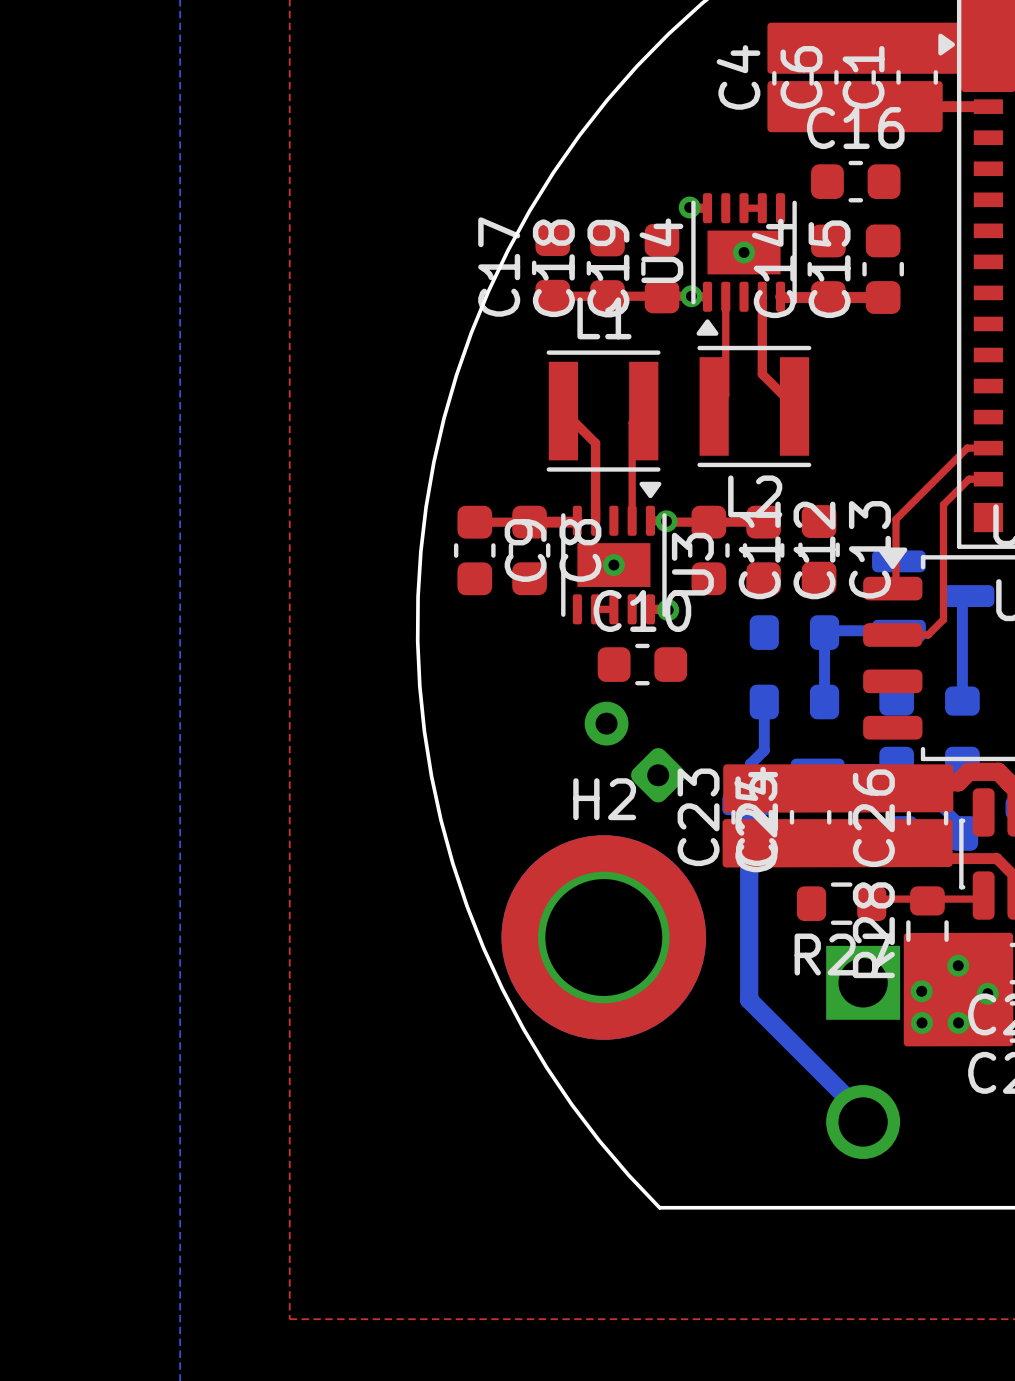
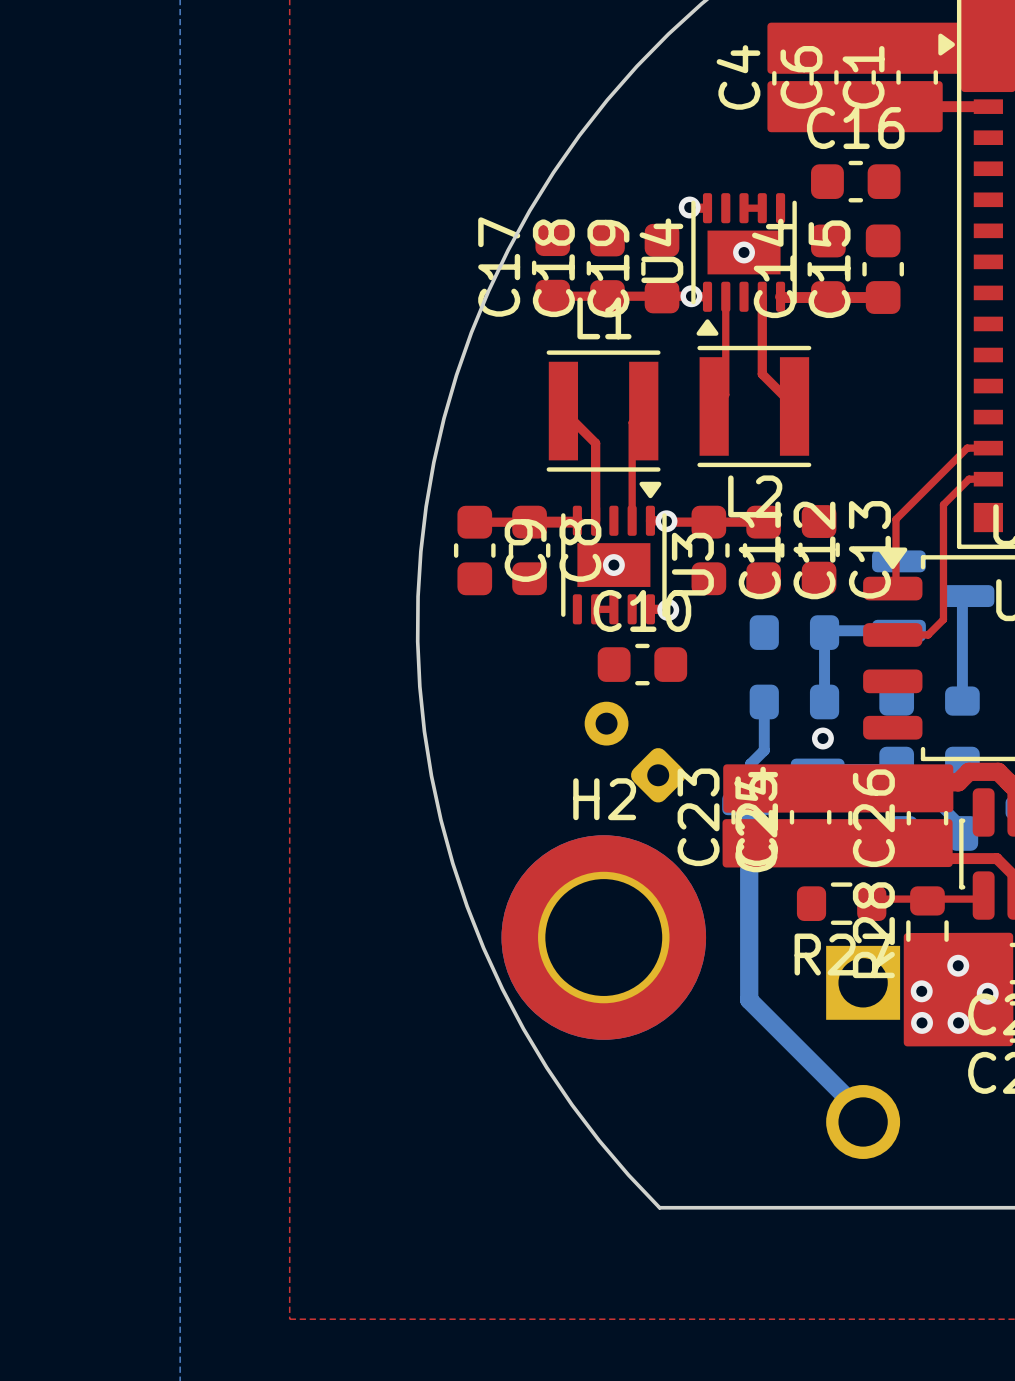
via: none -> (822, 738)

